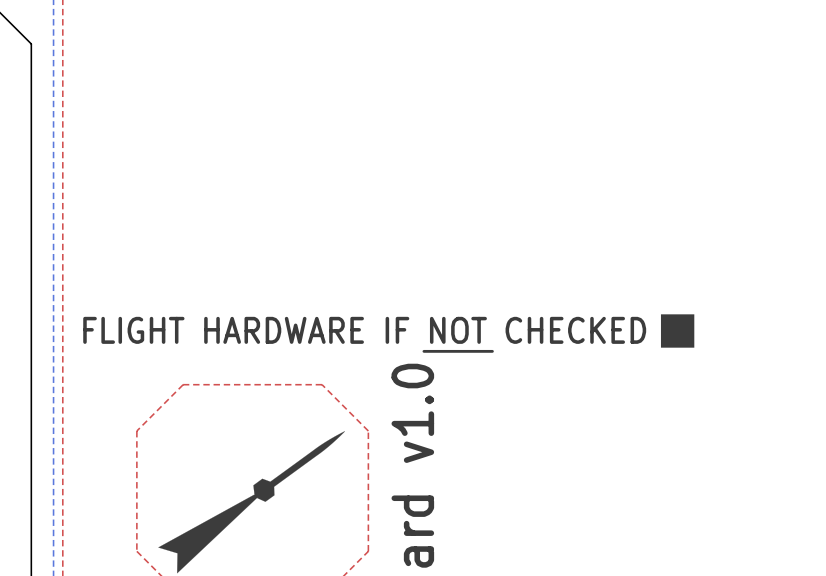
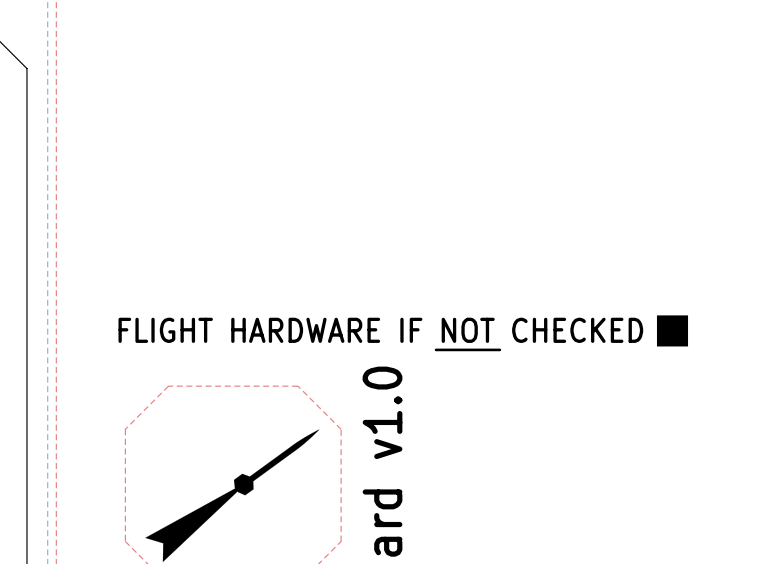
drawing position: (558, 333) -> (561, 333)

